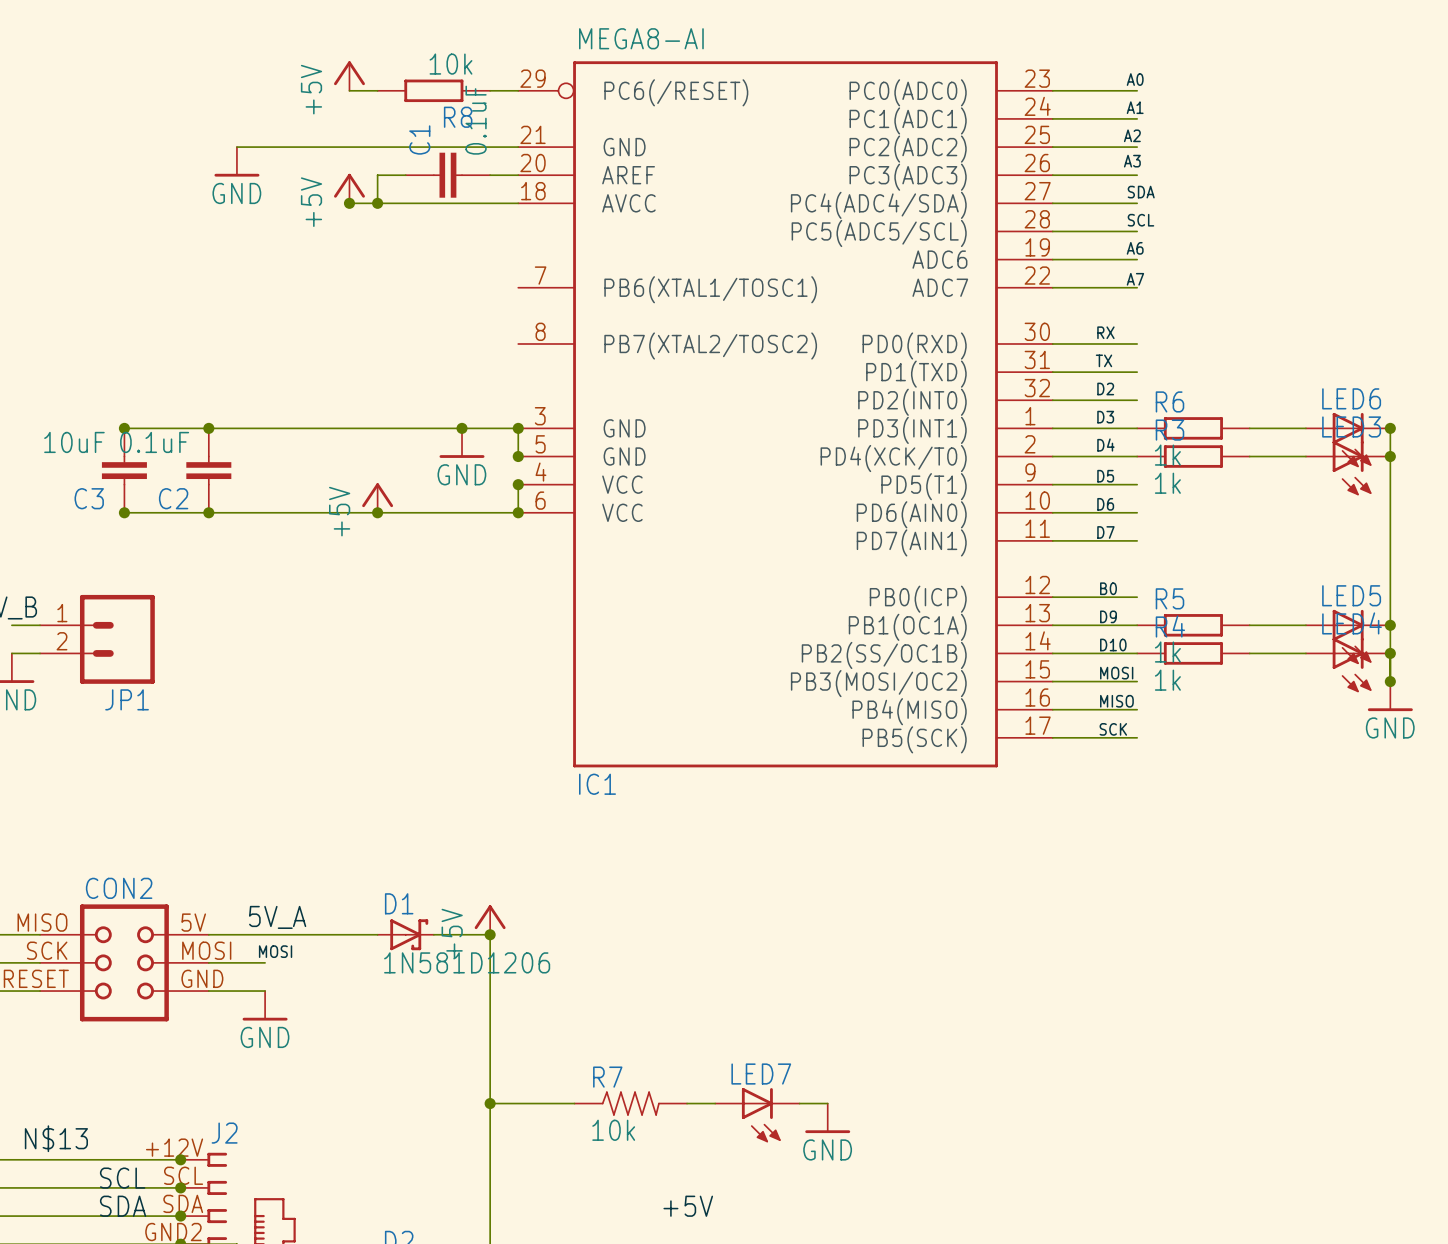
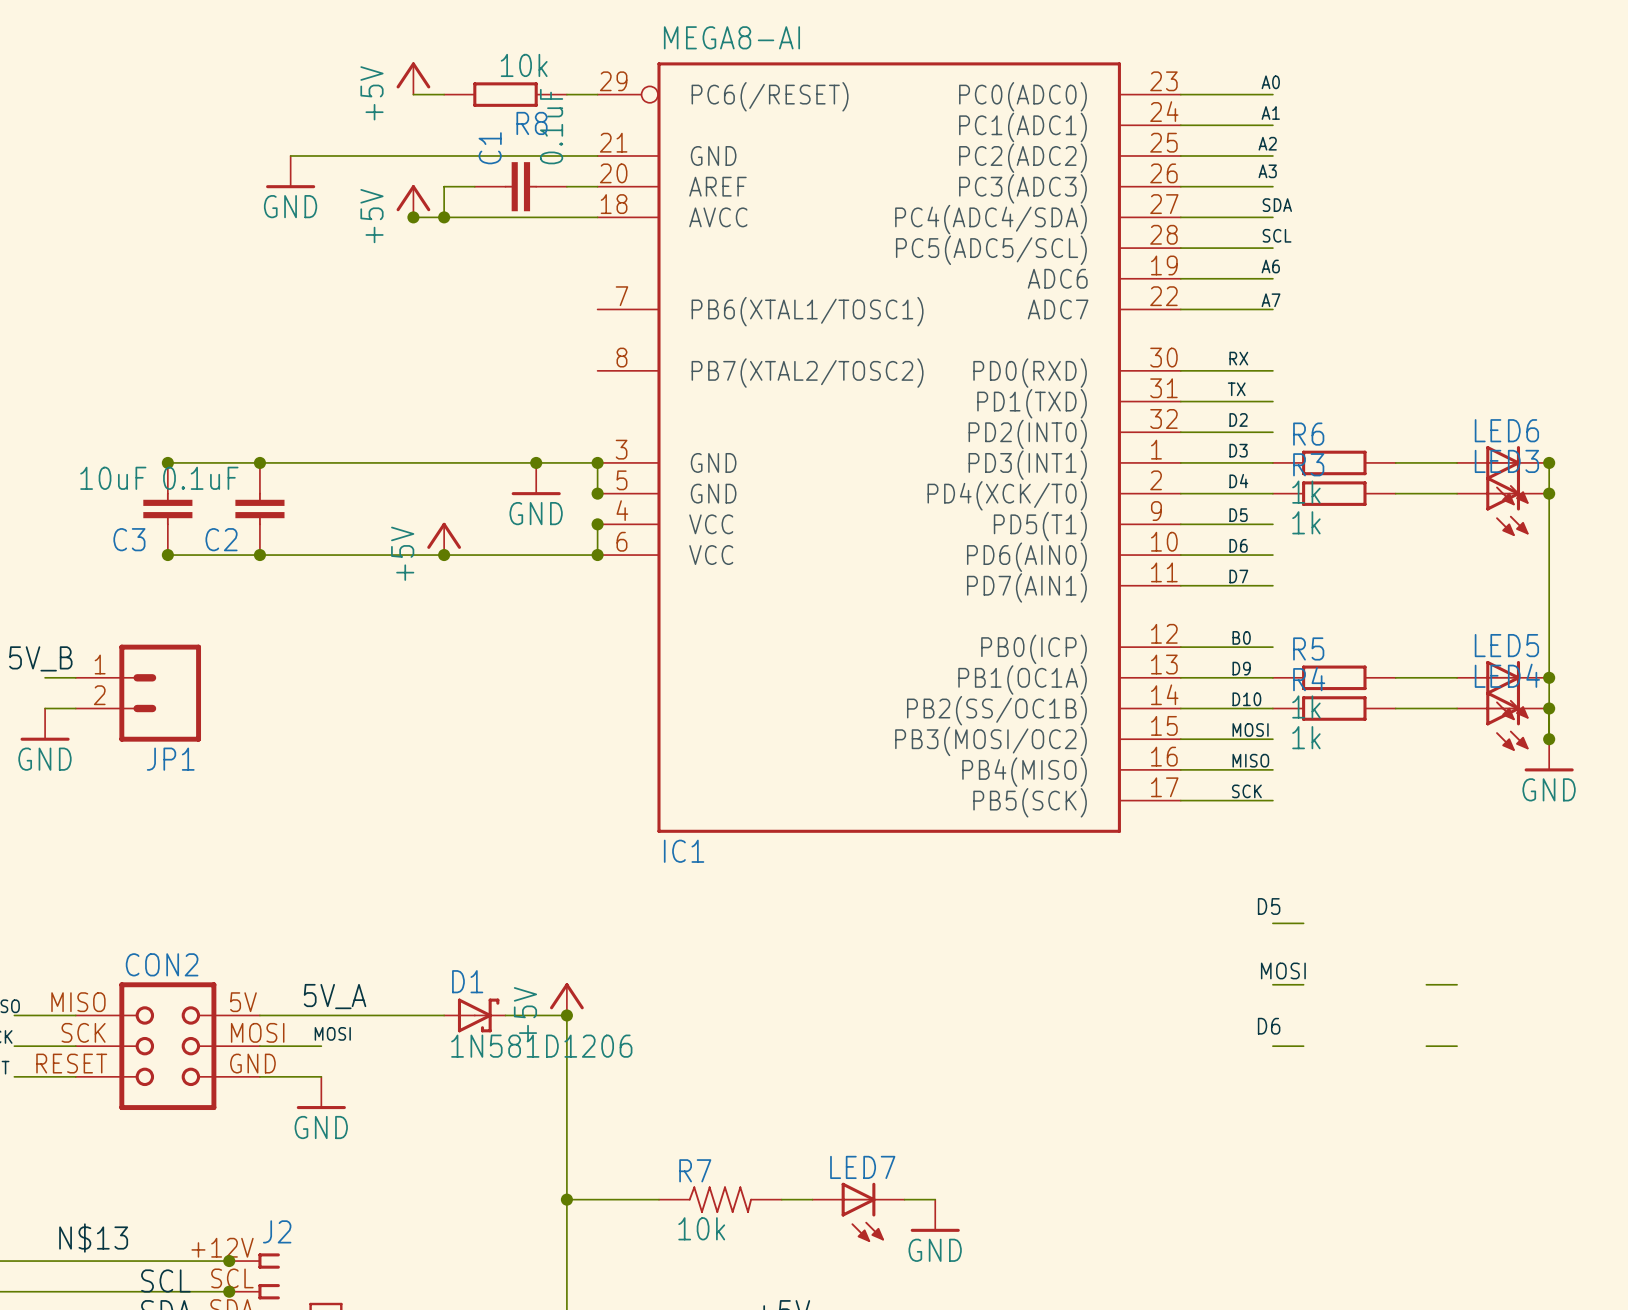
label: none -> D5 (1269, 906)
wire: none -> (1272, 923) (1303, 923)
label: none -> MOSI (1283, 970)
wire: none -> (1272, 984) (1303, 984)
wire: none -> (1426, 984) (1457, 984)
label: none -> D6 (1269, 1026)
wire: none -> (1272, 1046) (1303, 1046)
wire: none -> (1426, 1046) (1457, 1046)

